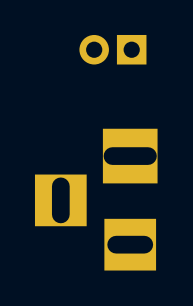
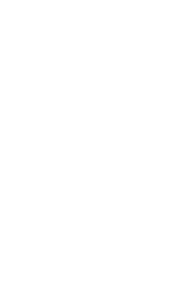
part: (112, 49) -> none
part: (96, 199) -> none

